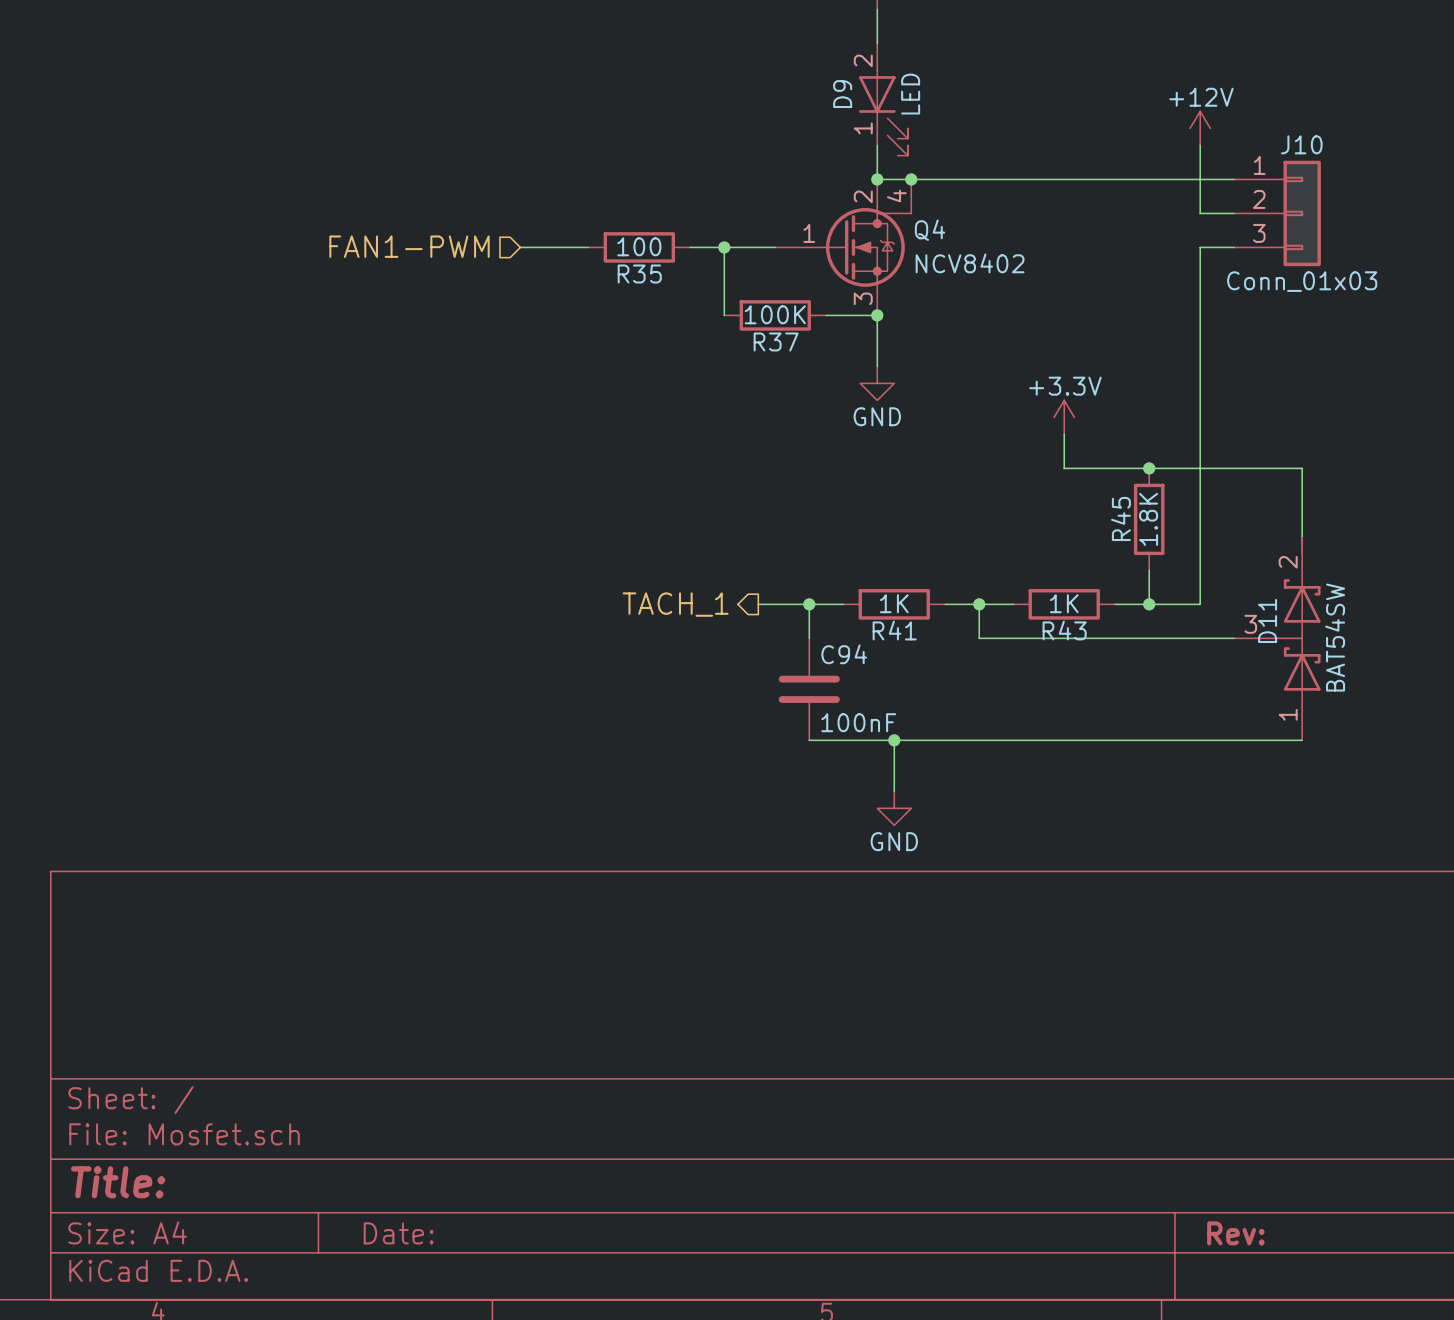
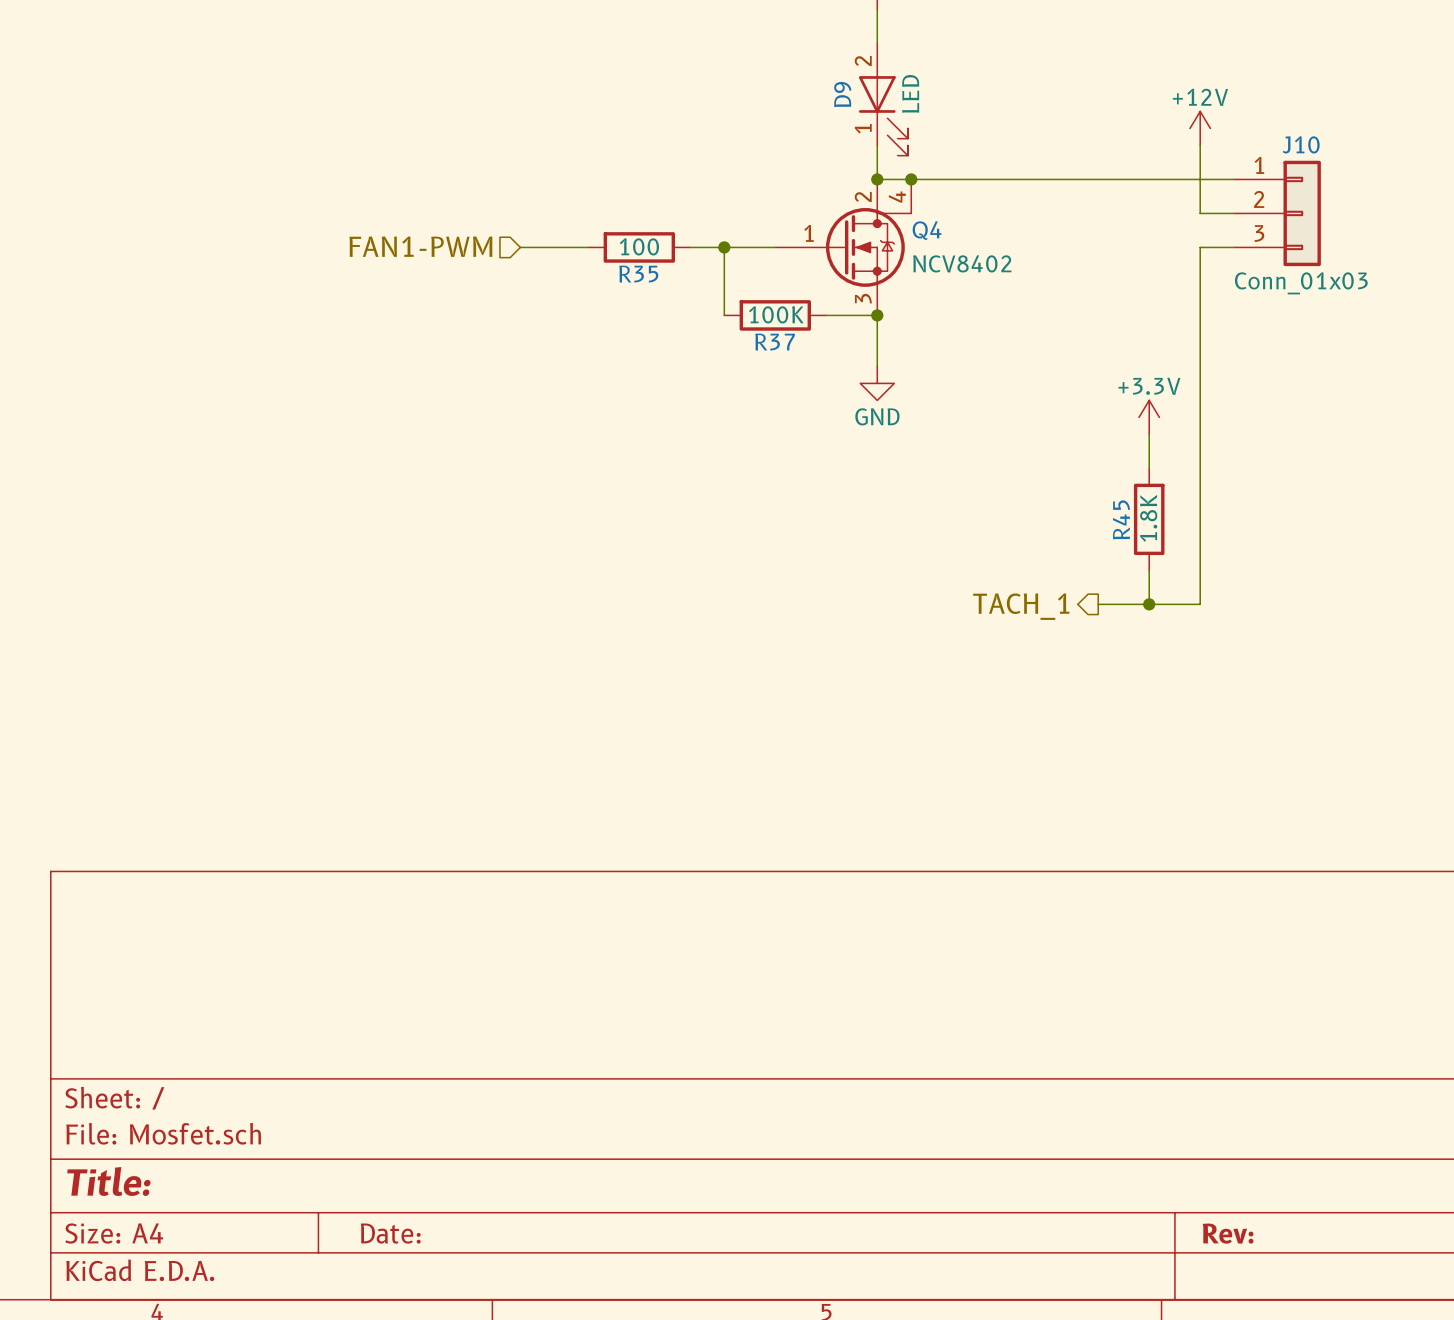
power symbol position: +3.3V (1064, 417) -> +3.3V (1149, 417)
wire: (1064, 434) (1064, 468) (1302, 468) (1302, 536) -> none
wire: none -> (1149, 434) (1149, 468)
junction: (1149, 468) -> none
hierarchical label: TACH_1 (675, 604) -> none
wire: (758, 604) (843, 604) -> none
wire: (809, 604) (809, 638) -> none
junction: (809, 604) -> none
R41: 1K (894, 604) -> none
wire: (945, 604) (1013, 604) -> none
wire: (979, 604) (979, 638) (1234, 638) -> none
junction: (979, 604) -> none
hierarchical label: none -> TACH_1 (1021, 606)
R43: 1K (1064, 604) -> none
D11: BAT54SW (1277, 638) -> none
C94: 100nF (809, 689) -> none
wire: (809, 740) (1302, 740) -> none
wire: (894, 740) (894, 791) -> none
junction: (894, 740) -> none
power symbol: GND (894, 808) -> none

